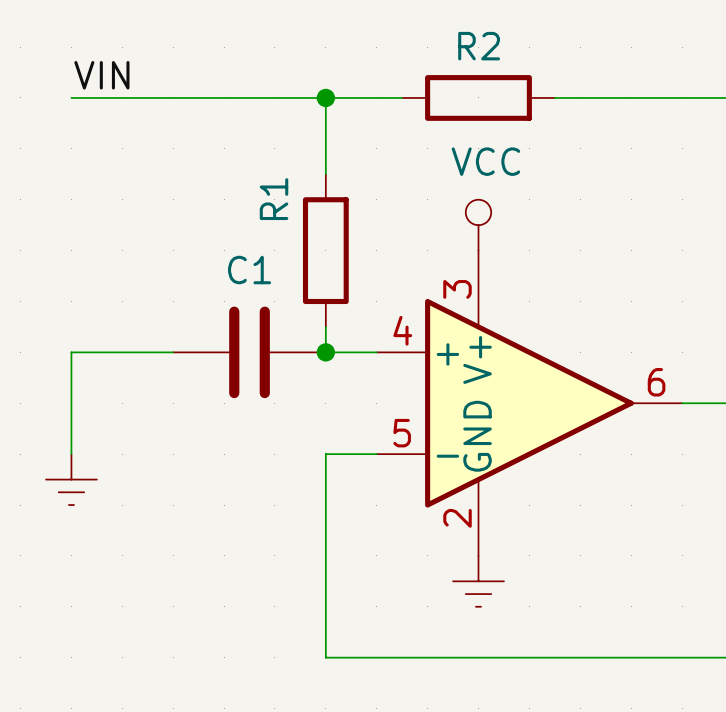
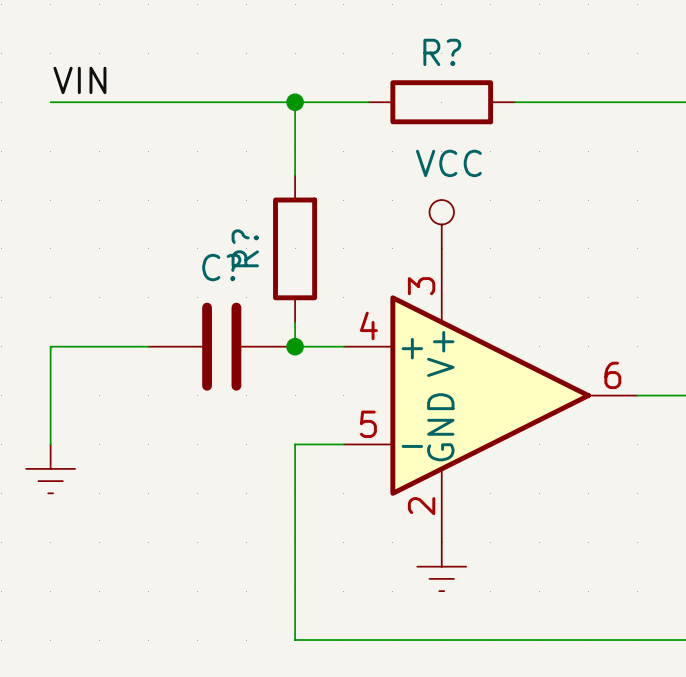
R2 name: R2 (479, 46) -> R? (442, 52)
R1 name: R1 (274, 199) -> R? (245, 248)
C1 name: C1 (249, 270) -> C? (221, 267)

